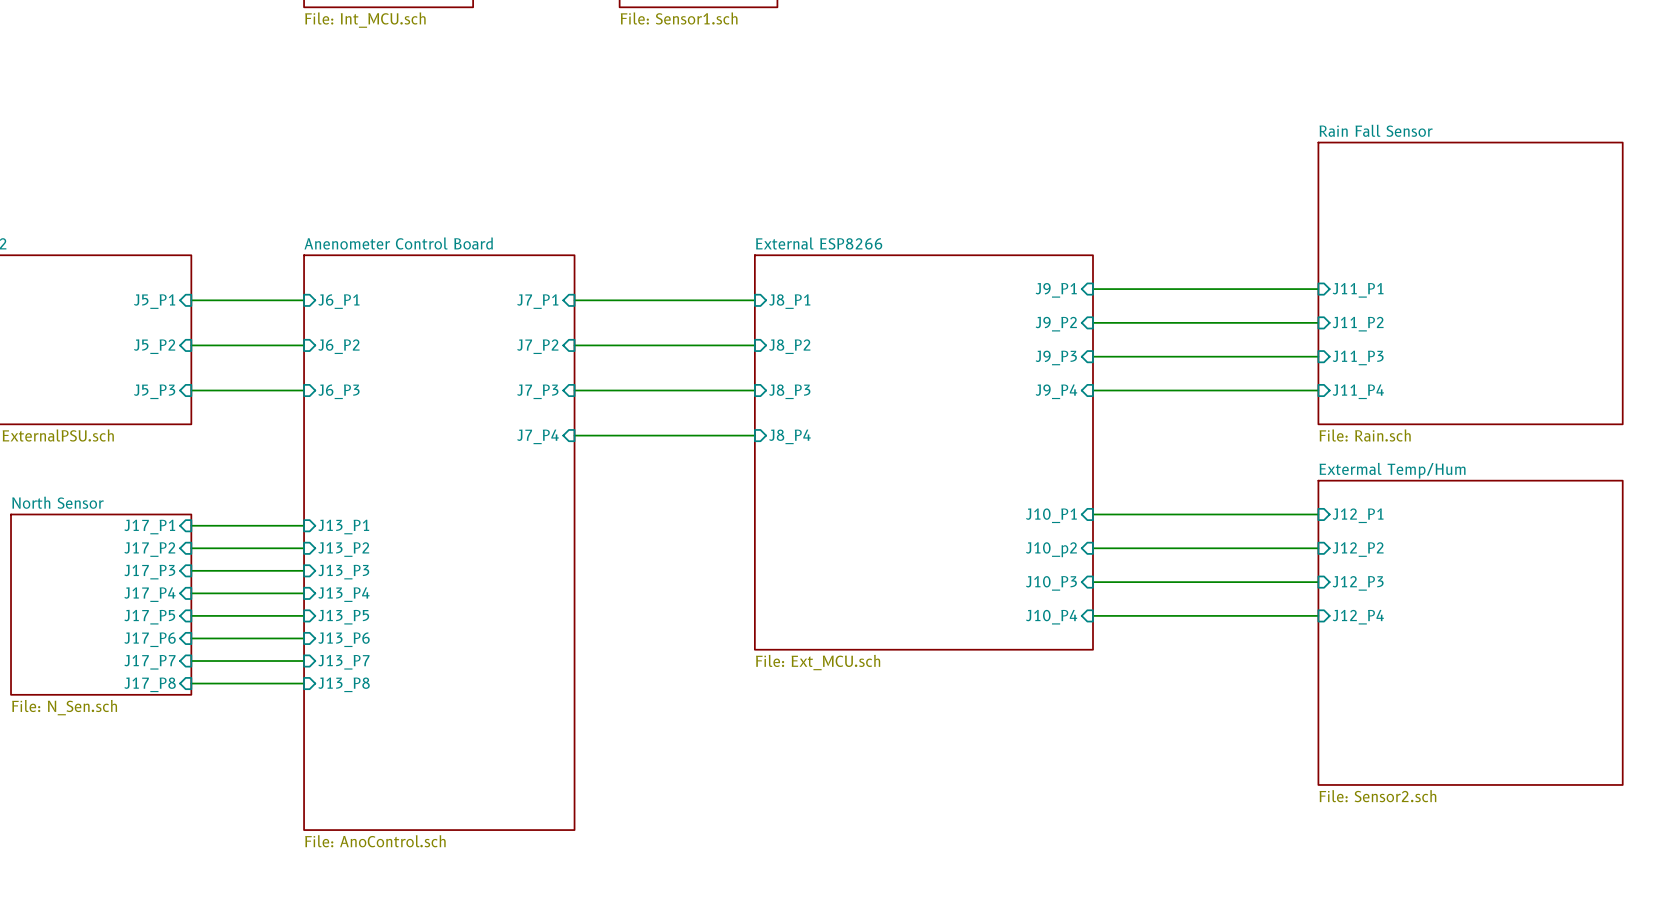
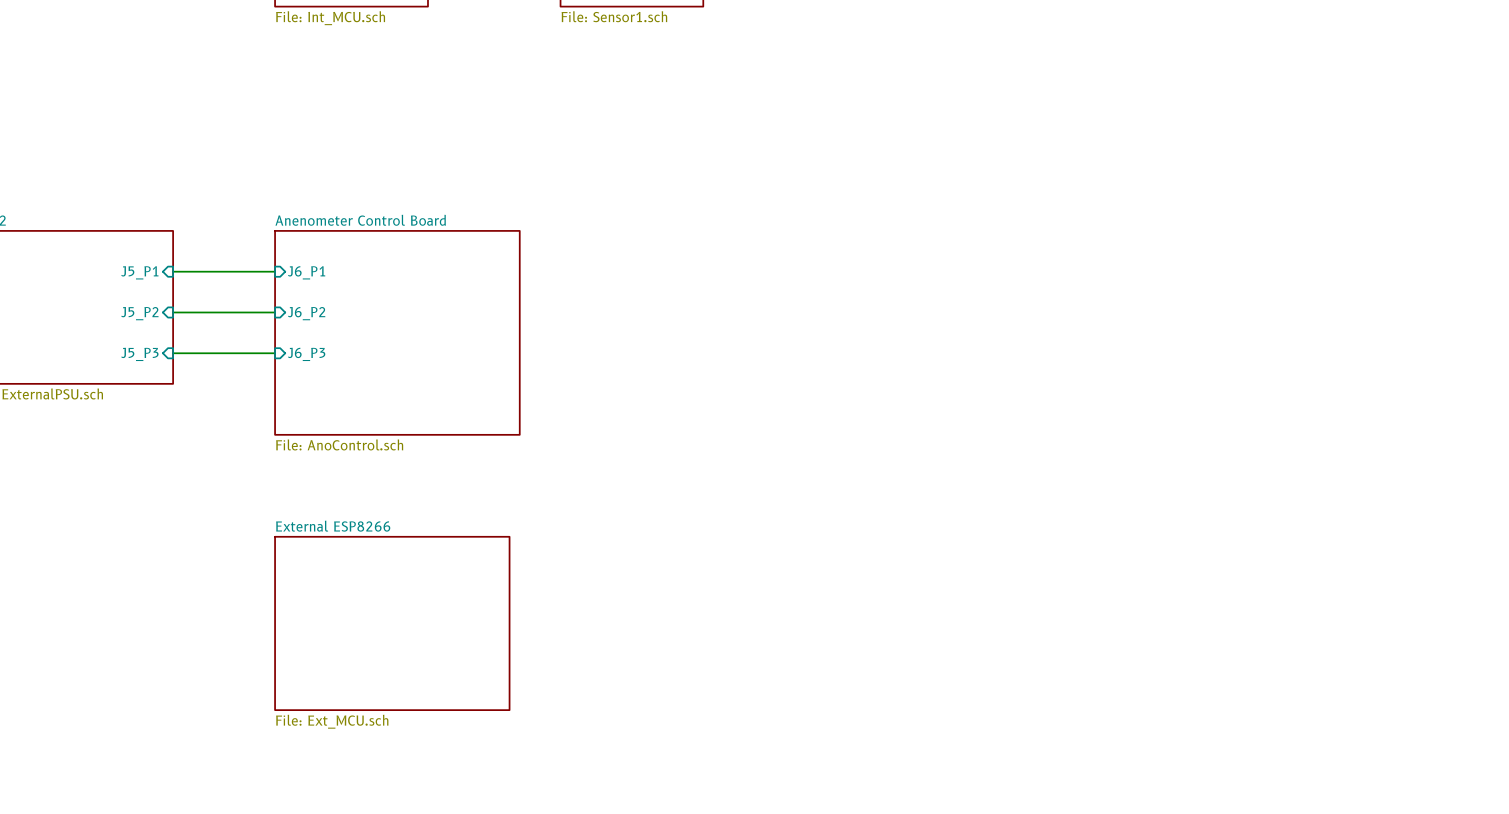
sheet External ESP8266 name position: External ESP8266 (819, 243) -> External ESP8266 (333, 526)
sheet External ESP8266 shape: [754, 255, 1093, 650] -> [275, 536, 510, 711]
sheet Rain Fall Sensor: File: Rain.sch (1470, 283) -> none
wire: (1092, 289) (1318, 289) -> none
sheet pin: J9_P1 (1056, 290) -> none
sheet pin: J11_P1 (1358, 290) -> none
wire: (574, 300) (754, 300) -> none
sheet pin: J7_P1 (537, 301) -> none
sheet pin: J8_P1 (789, 301) -> none
wire: (1092, 322) (1318, 322) -> none
sheet pin: J9_P2 (1056, 324) -> none
sheet pin: J11_P2 (1358, 324) -> none
wire: (574, 345) (754, 345) -> none
sheet pin: J7_P2 (537, 346) -> none
sheet pin: J8_P2 (789, 346) -> none
wire: (1092, 356) (1318, 356) -> none
sheet pin: J9_P3 (1056, 357) -> none
sheet pin: J11_P3 (1358, 357) -> none
sheet Anenometer Control Board: none -> File: AnoControl.sch (397, 332)
wire: (574, 390) (754, 390) -> none
wire: (1092, 390) (1318, 390) -> none
sheet pin: J7_P3 (537, 391) -> none
sheet pin: J8_P3 (789, 391) -> none
sheet pin: J9_P4 (1056, 391) -> none
sheet pin: J11_P4 (1358, 391) -> none
wire: (574, 435) (754, 435) -> none
sheet pin: J7_P4 (537, 436) -> none
sheet pin: J8_P4 (789, 436) -> none
wire: (1092, 514) (1318, 514) -> none
sheet pin: J10_P1 (1051, 515) -> none
sheet pin: J12_P1 (1358, 515) -> none
wire: (191, 525) (304, 525) -> none
sheet pin: J17_P1 (149, 527) -> none
sheet pin: J13_P1 (343, 527) -> none
sheet Anenometer Control Board: File: AnoControl.sch (439, 542) -> none
wire: (191, 548) (304, 548) -> none
wire: (1092, 548) (1318, 548) -> none
sheet pin: J17_P2 (149, 549) -> none
sheet pin: J13_P2 (343, 549) -> none
sheet pin: J10_p2 (1051, 549) -> none
sheet pin: J12_P2 (1358, 549) -> none
wire: (191, 570) (304, 570) -> none
sheet pin: J17_P3 (149, 572) -> none
sheet pin: J13_P3 (343, 572) -> none
wire: (1092, 582) (1318, 582) -> none
sheet pin: J10_P3 (1051, 583) -> none
sheet pin: J12_P3 (1358, 583) -> none
wire: (191, 593) (304, 593) -> none
sheet pin: J17_P4 (149, 594) -> none
sheet pin: J13_P4 (343, 594) -> none
sheet North Sensor: File: N_Sen.sch (101, 604) -> none
wire: (191, 615) (304, 615) -> none
wire: (1092, 615) (1318, 615) -> none
sheet pin: J17_P5 (149, 617) -> none
sheet pin: J13_P5 (343, 617) -> none
sheet pin: J10_P4 (1051, 617) -> none
sheet pin: J12_P4 (1358, 617) -> none
sheet Extermal Temp/Hum: File: Sensor2.sch (1470, 632) -> none
wire: (191, 638) (304, 638) -> none
sheet pin: J17_P6 (150, 639) -> none
sheet pin: J13_P6 (344, 639) -> none
wire: (191, 661) (304, 661) -> none
sheet pin: J17_P7 (149, 662) -> none
sheet pin: J13_P7 (343, 662) -> none
sheet External ESP8266 value position: File: Ext_MCU.sch (818, 662) -> File: Ext_MCU.sch (332, 721)
wire: (191, 683) (304, 683) -> none
sheet pin: J17_P8 (150, 684) -> none
sheet pin: J13_P8 (344, 684) -> none

